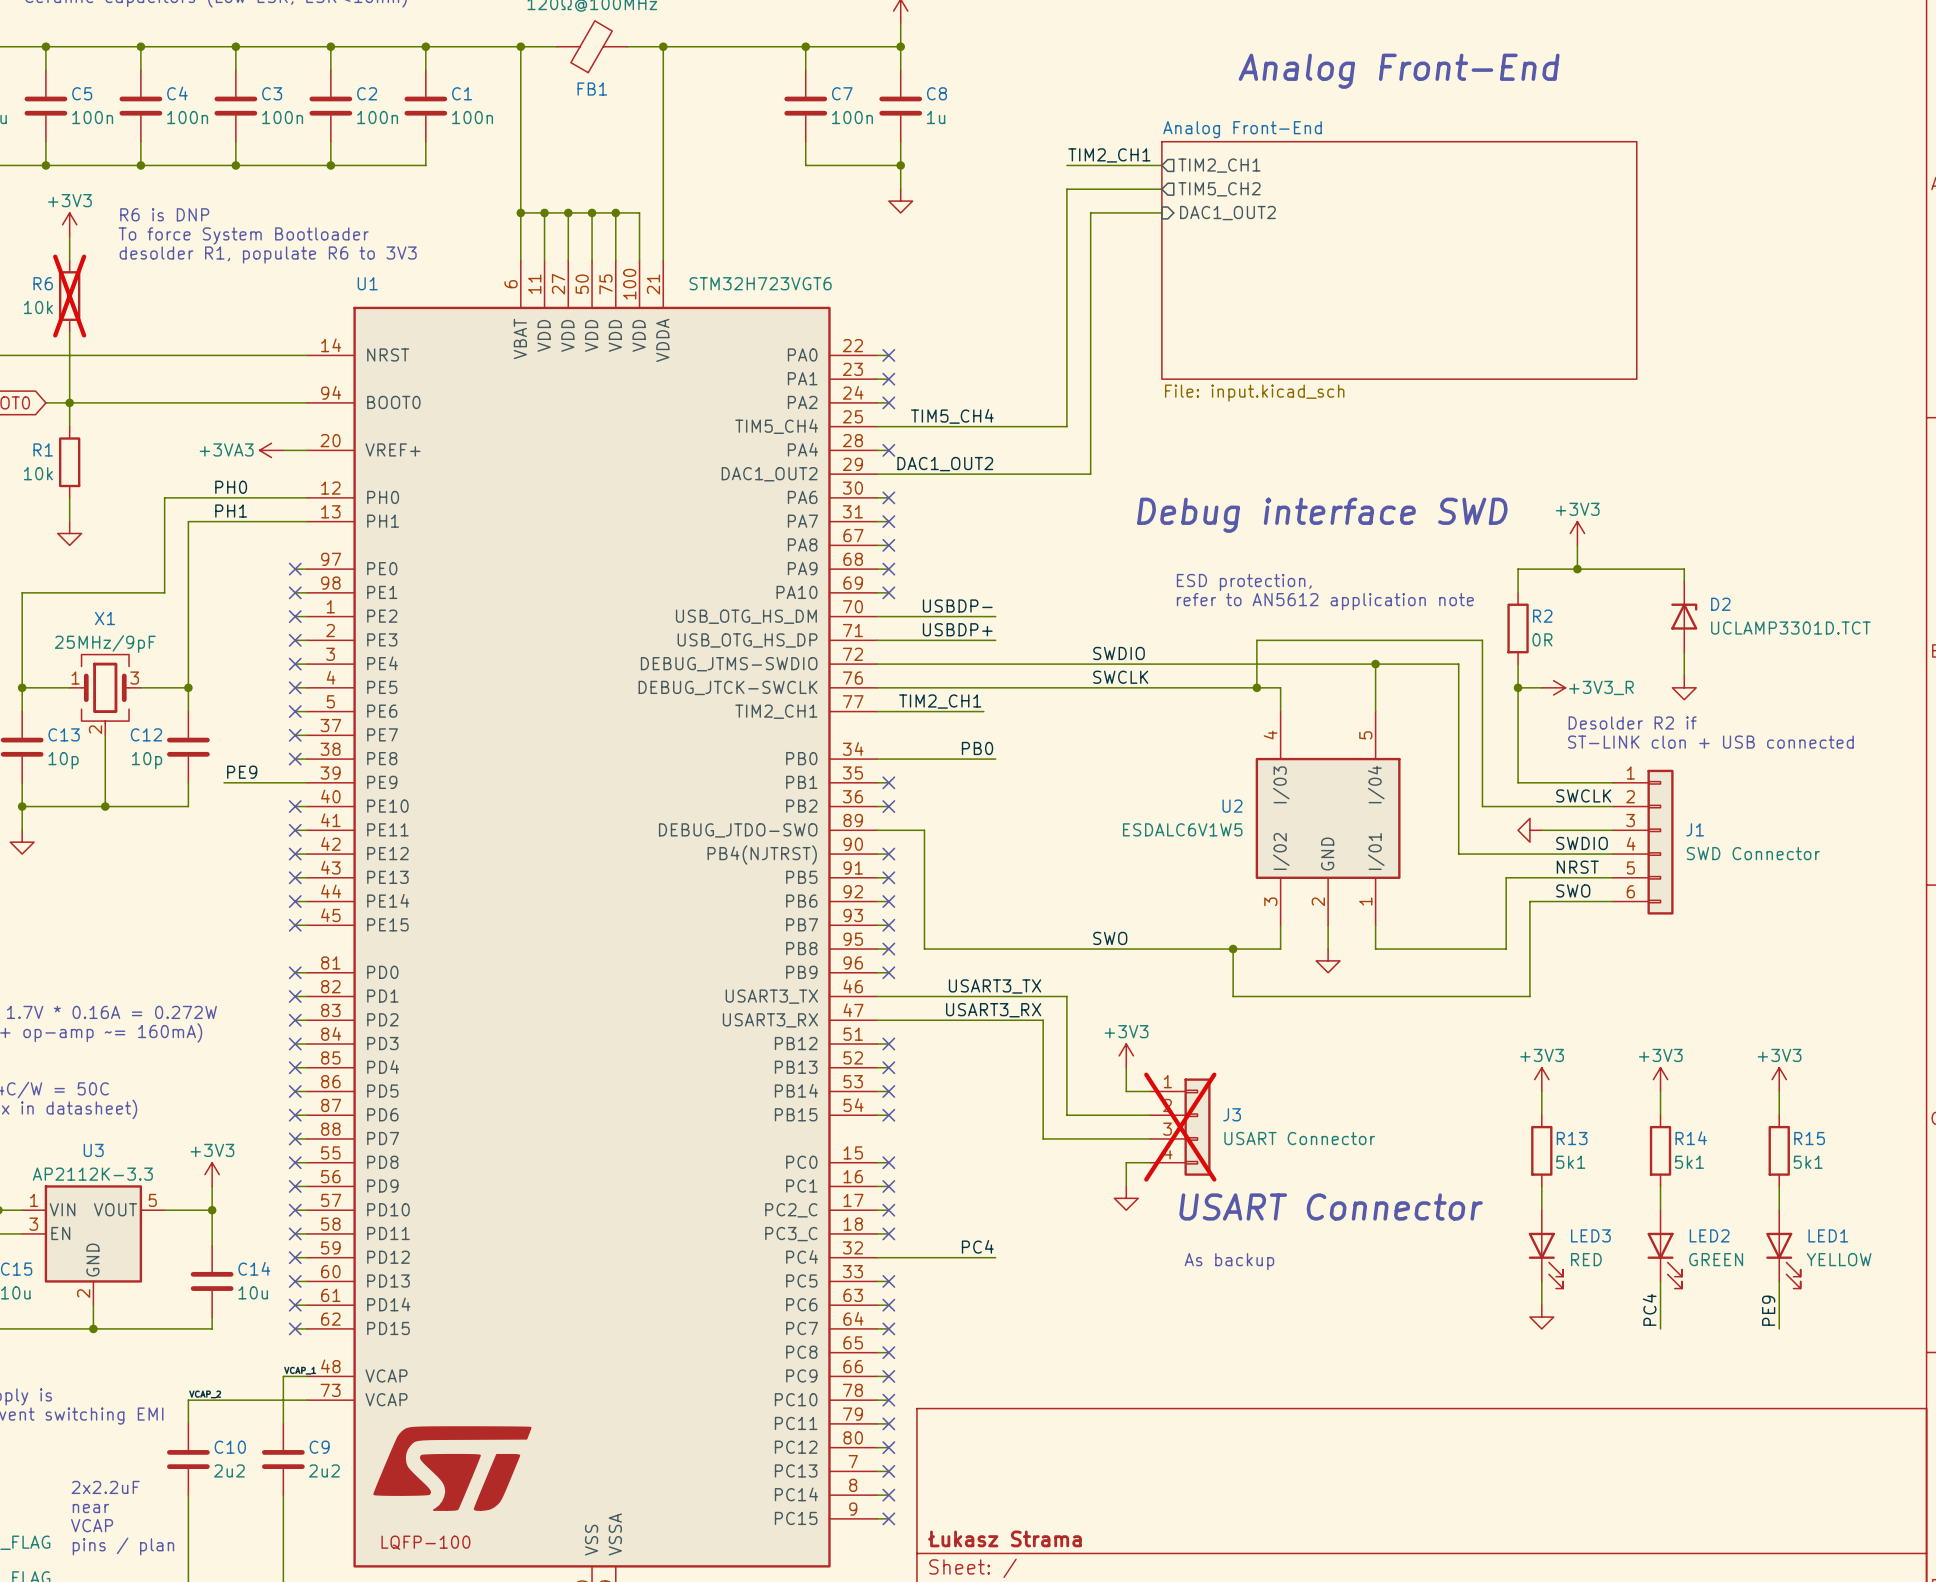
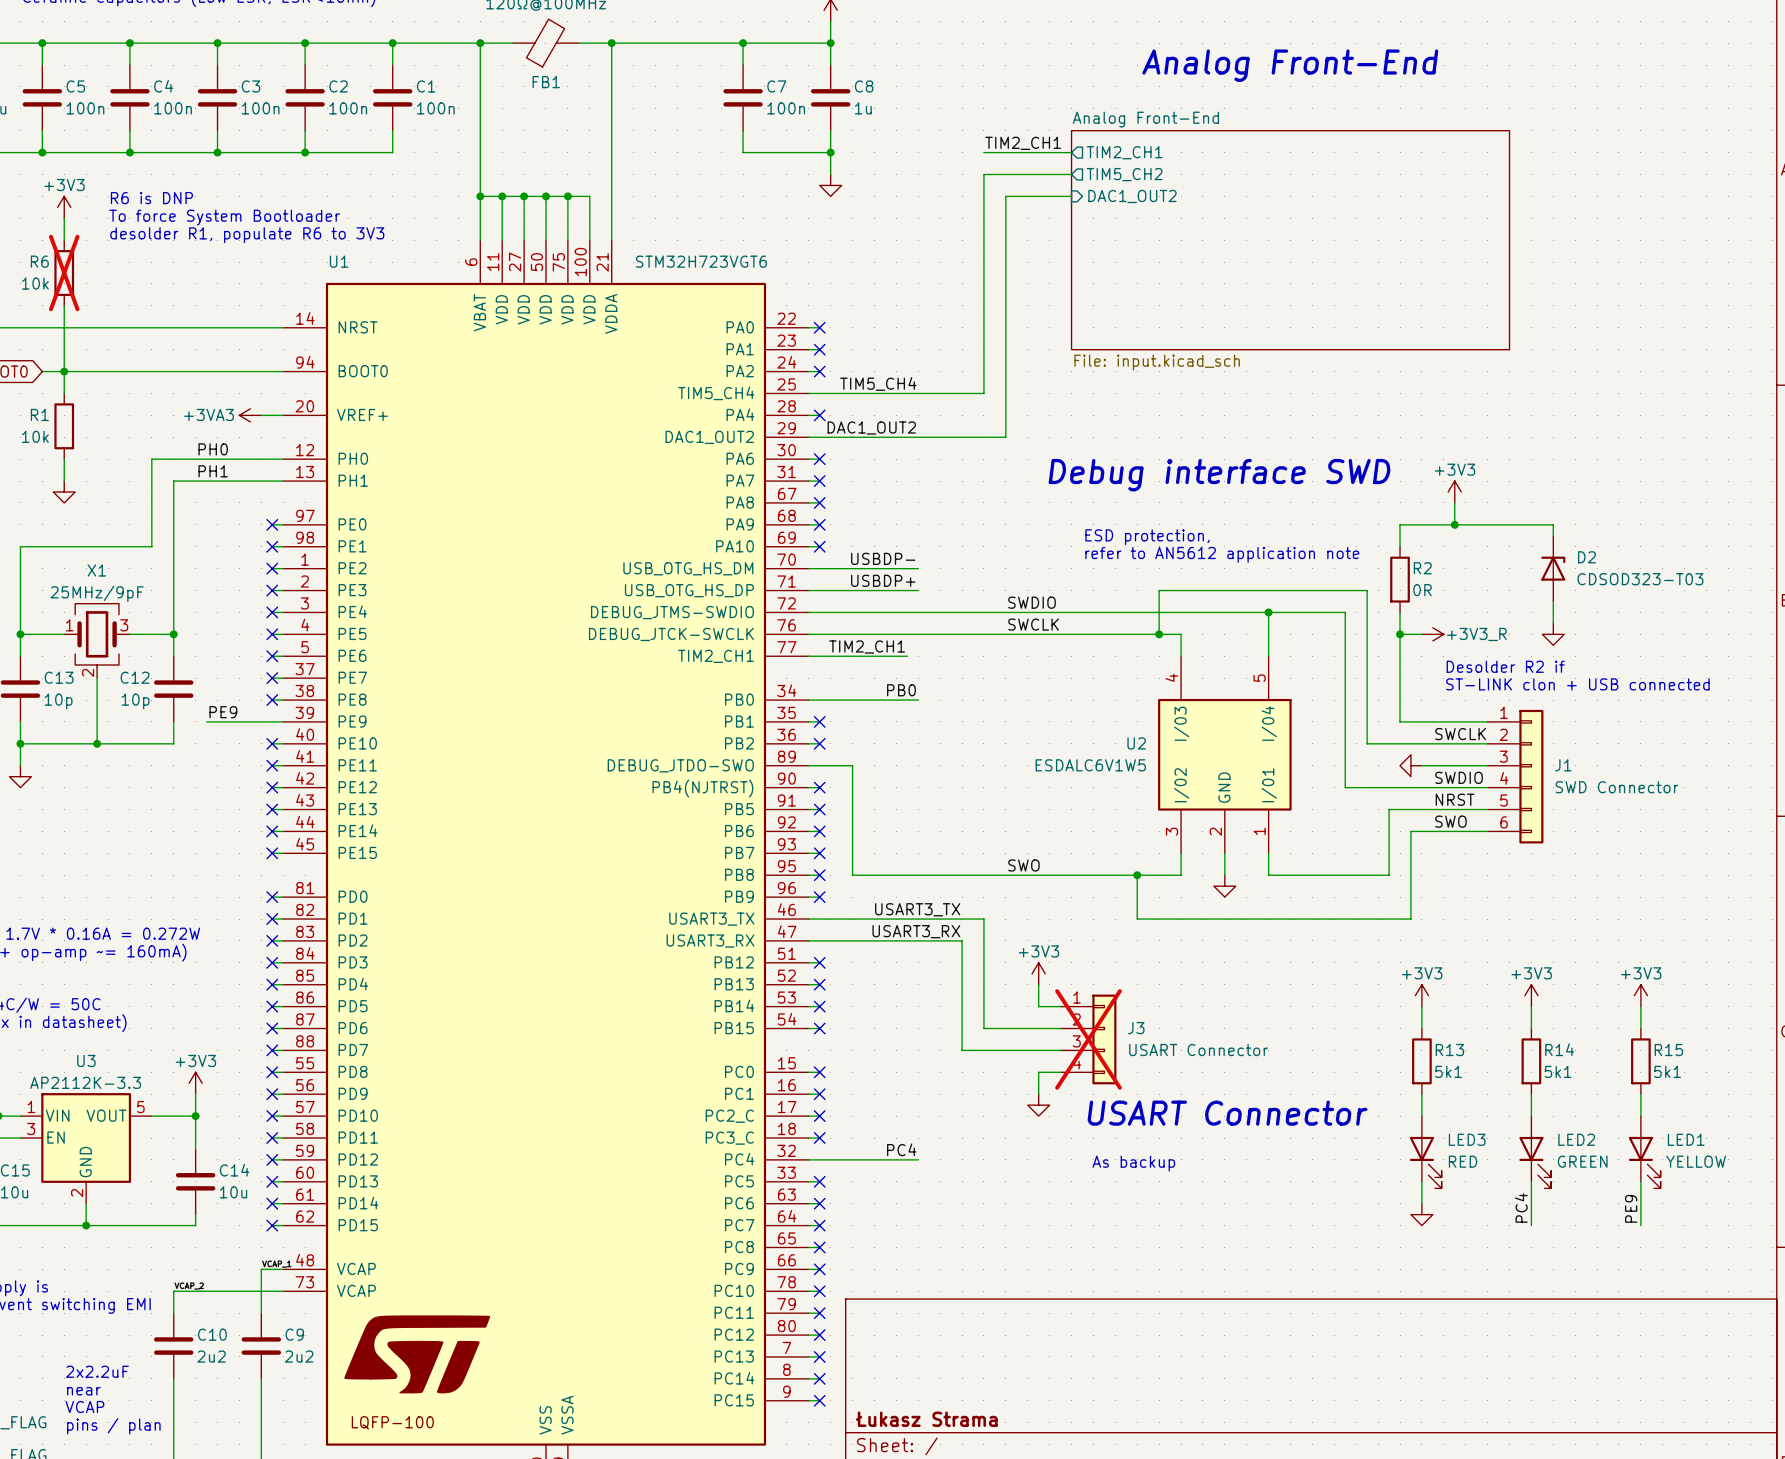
D2 value: UCLAMP3301D.TCT (1790, 628) -> CDSOD323-T03 (1640, 579)

